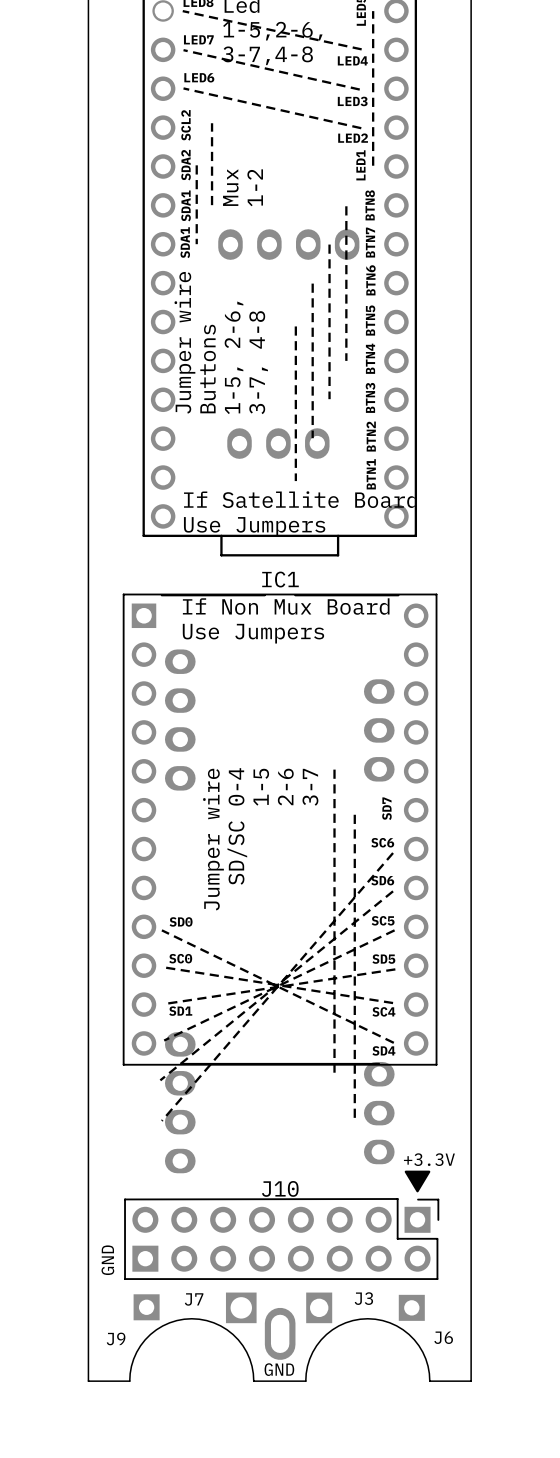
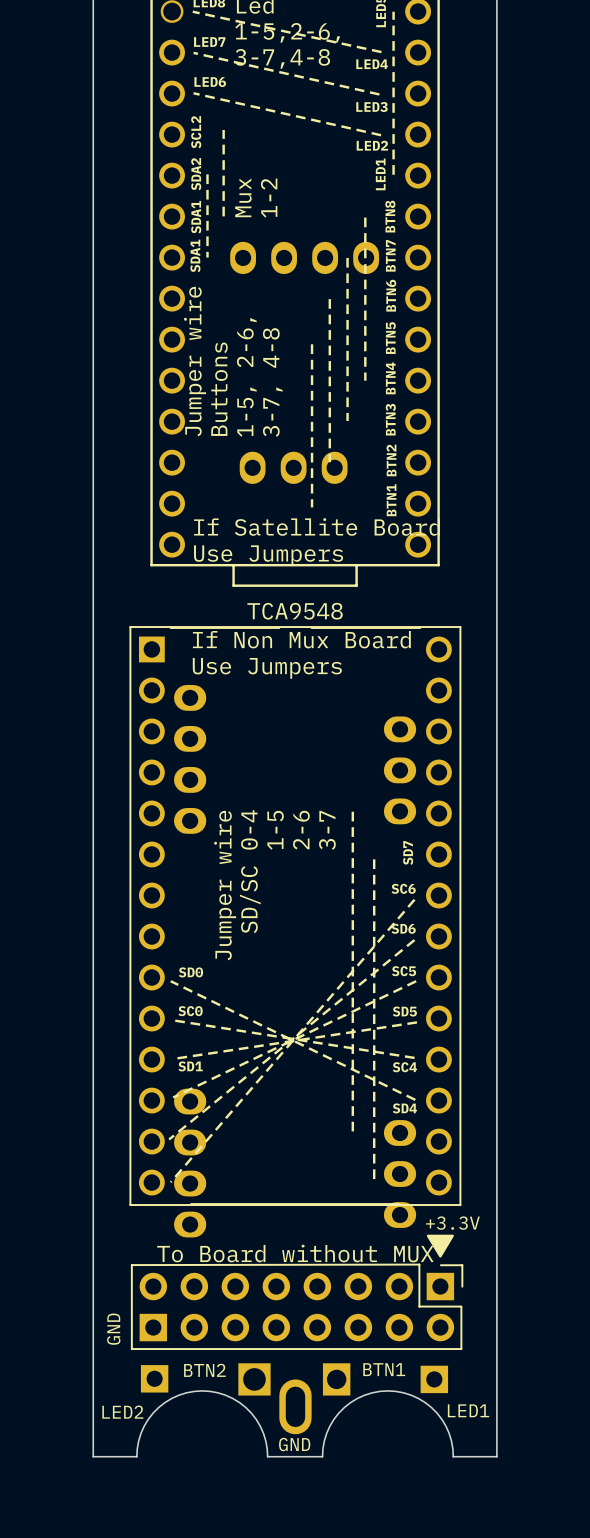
IC1: (280, 829) -> none
TCA9548: none -> (295, 916)
J10 name: J10 (280, 1188) -> To Board without MUX (295, 1253)
J3 name: J3 (363, 1298) -> BTN1 (384, 1369)
J7 name: J7 (194, 1299) -> BTN2 (204, 1370)
J6 name: J6 (443, 1337) -> LED1 (468, 1410)
J9 name: J9 (116, 1338) -> LED2 (122, 1412)

